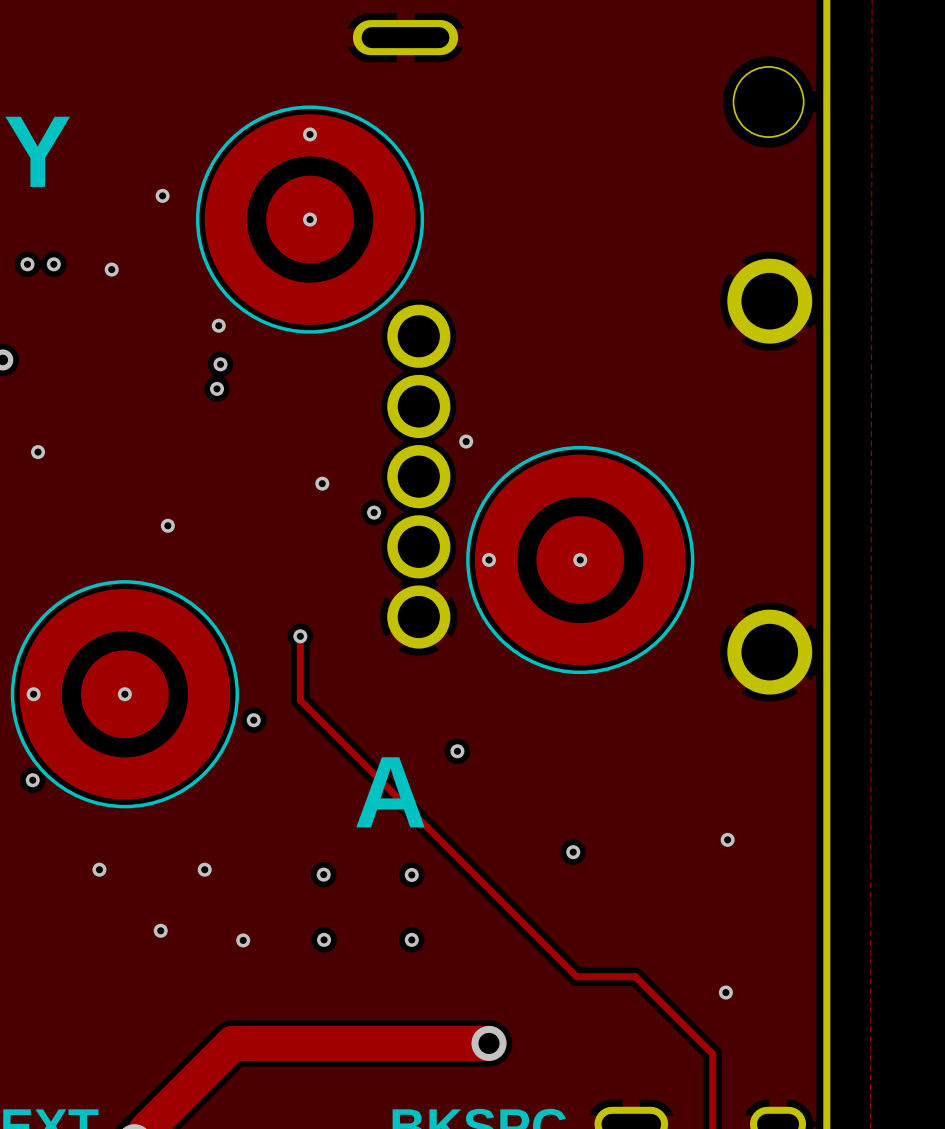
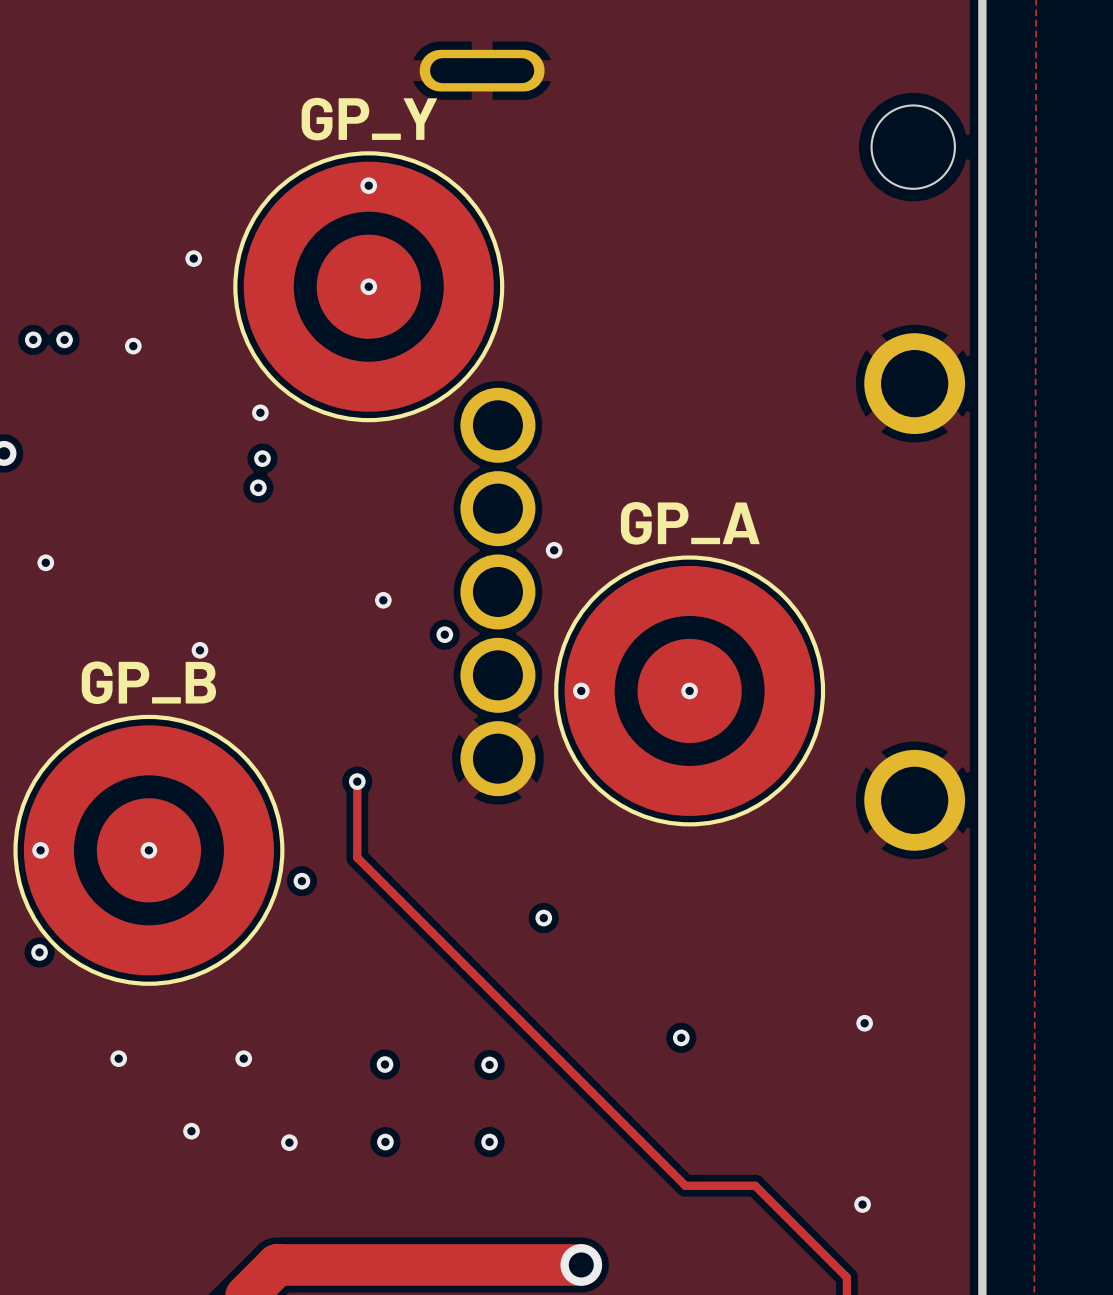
part value: none -> GP_Y (369, 119)
text: Y (37, 151) -> none
part value: none -> GP_A (690, 523)
part value: none -> GP_B (148, 682)
text: A (390, 792) -> none

